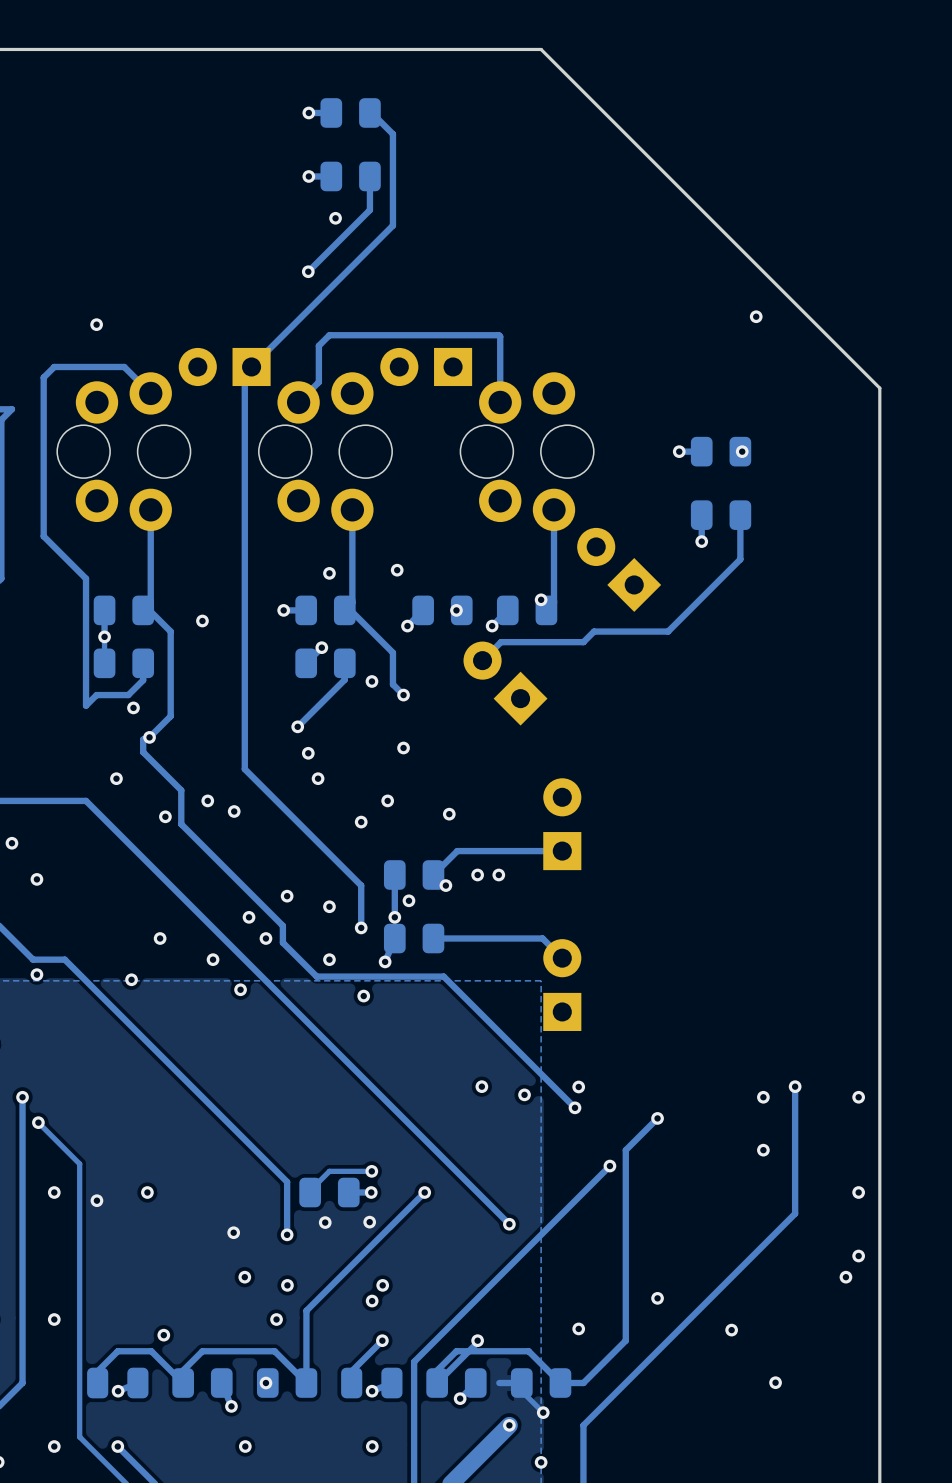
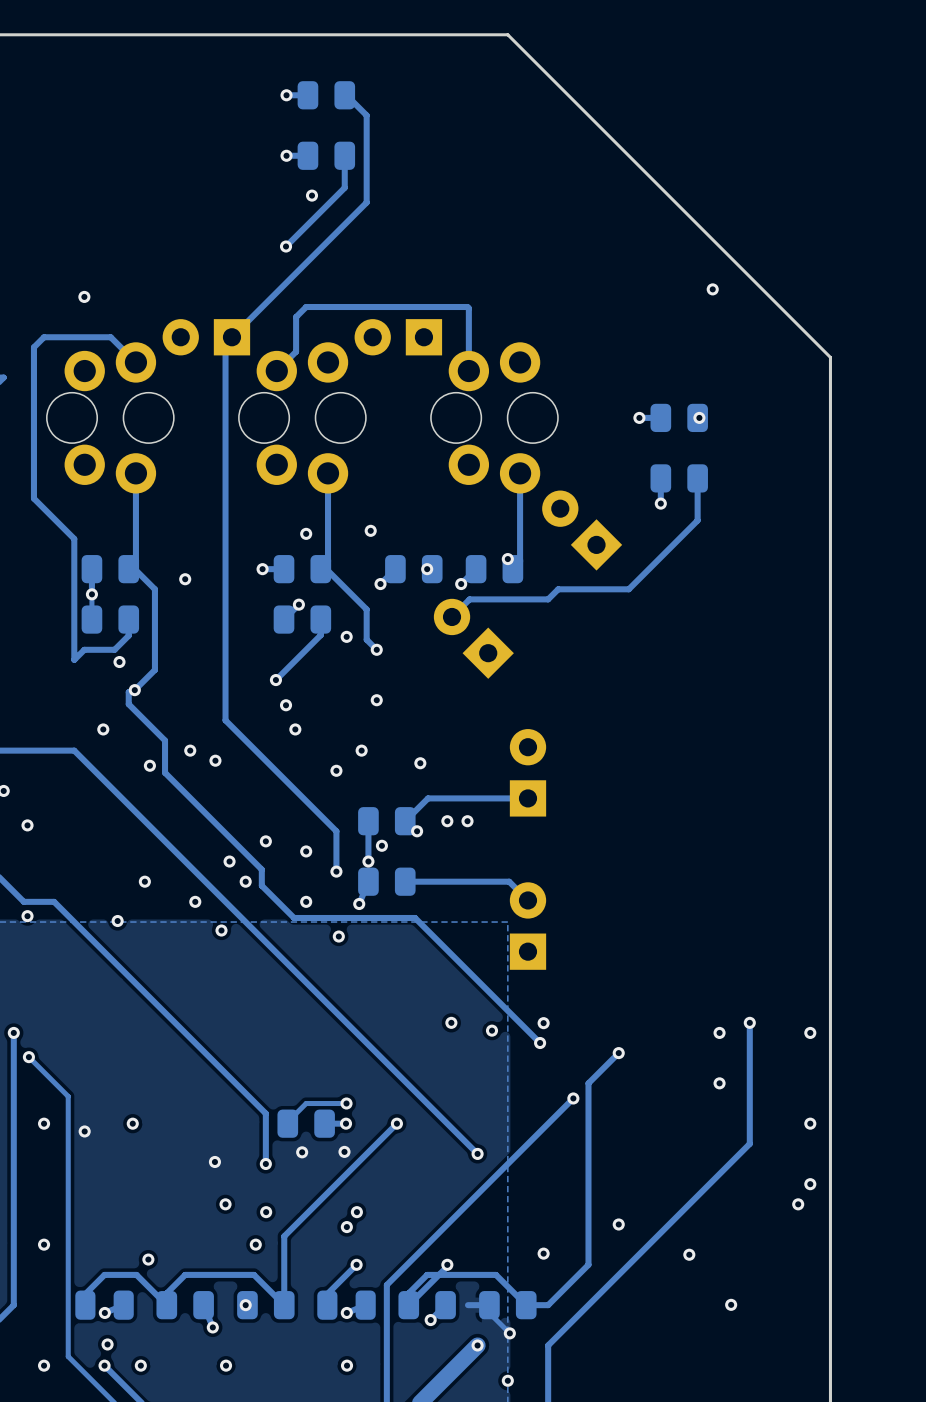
via: none -> (107, 1344)
via: none -> (140, 1365)

